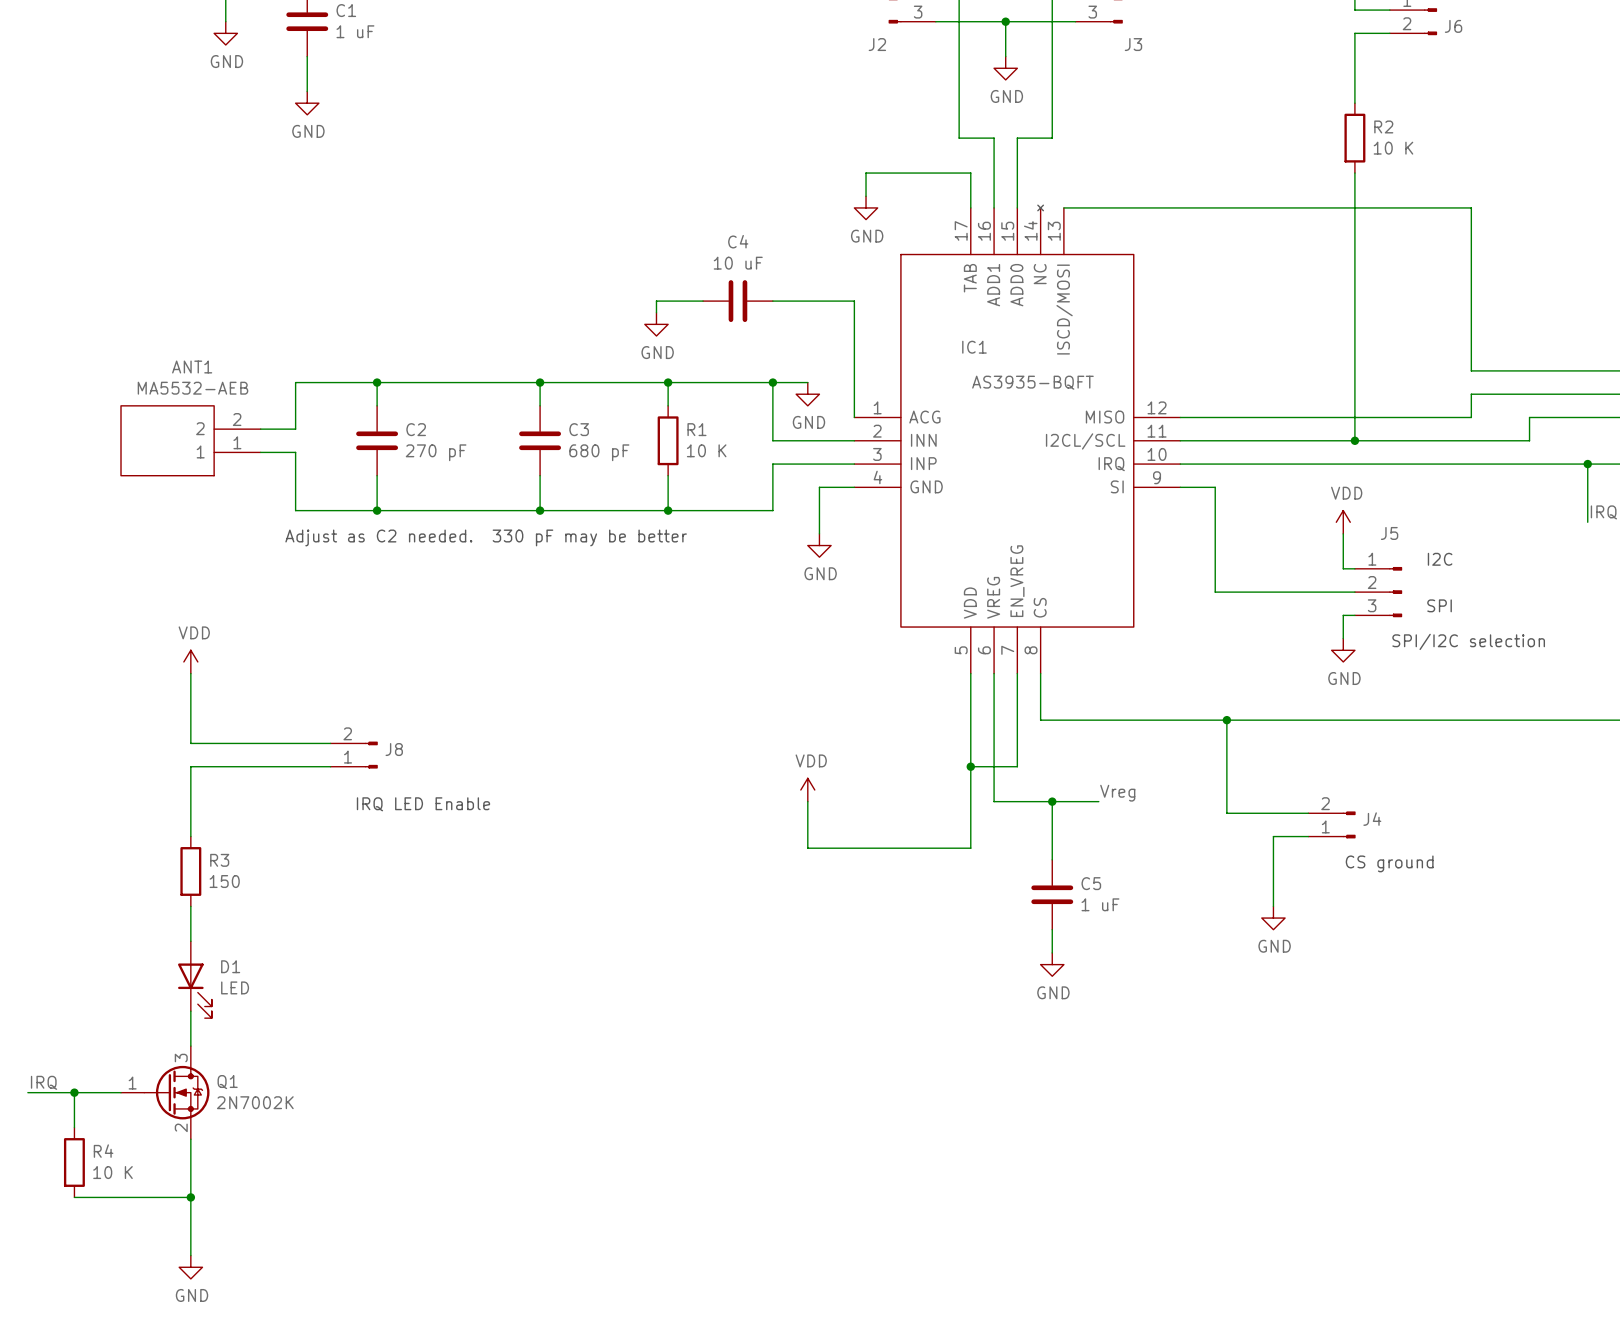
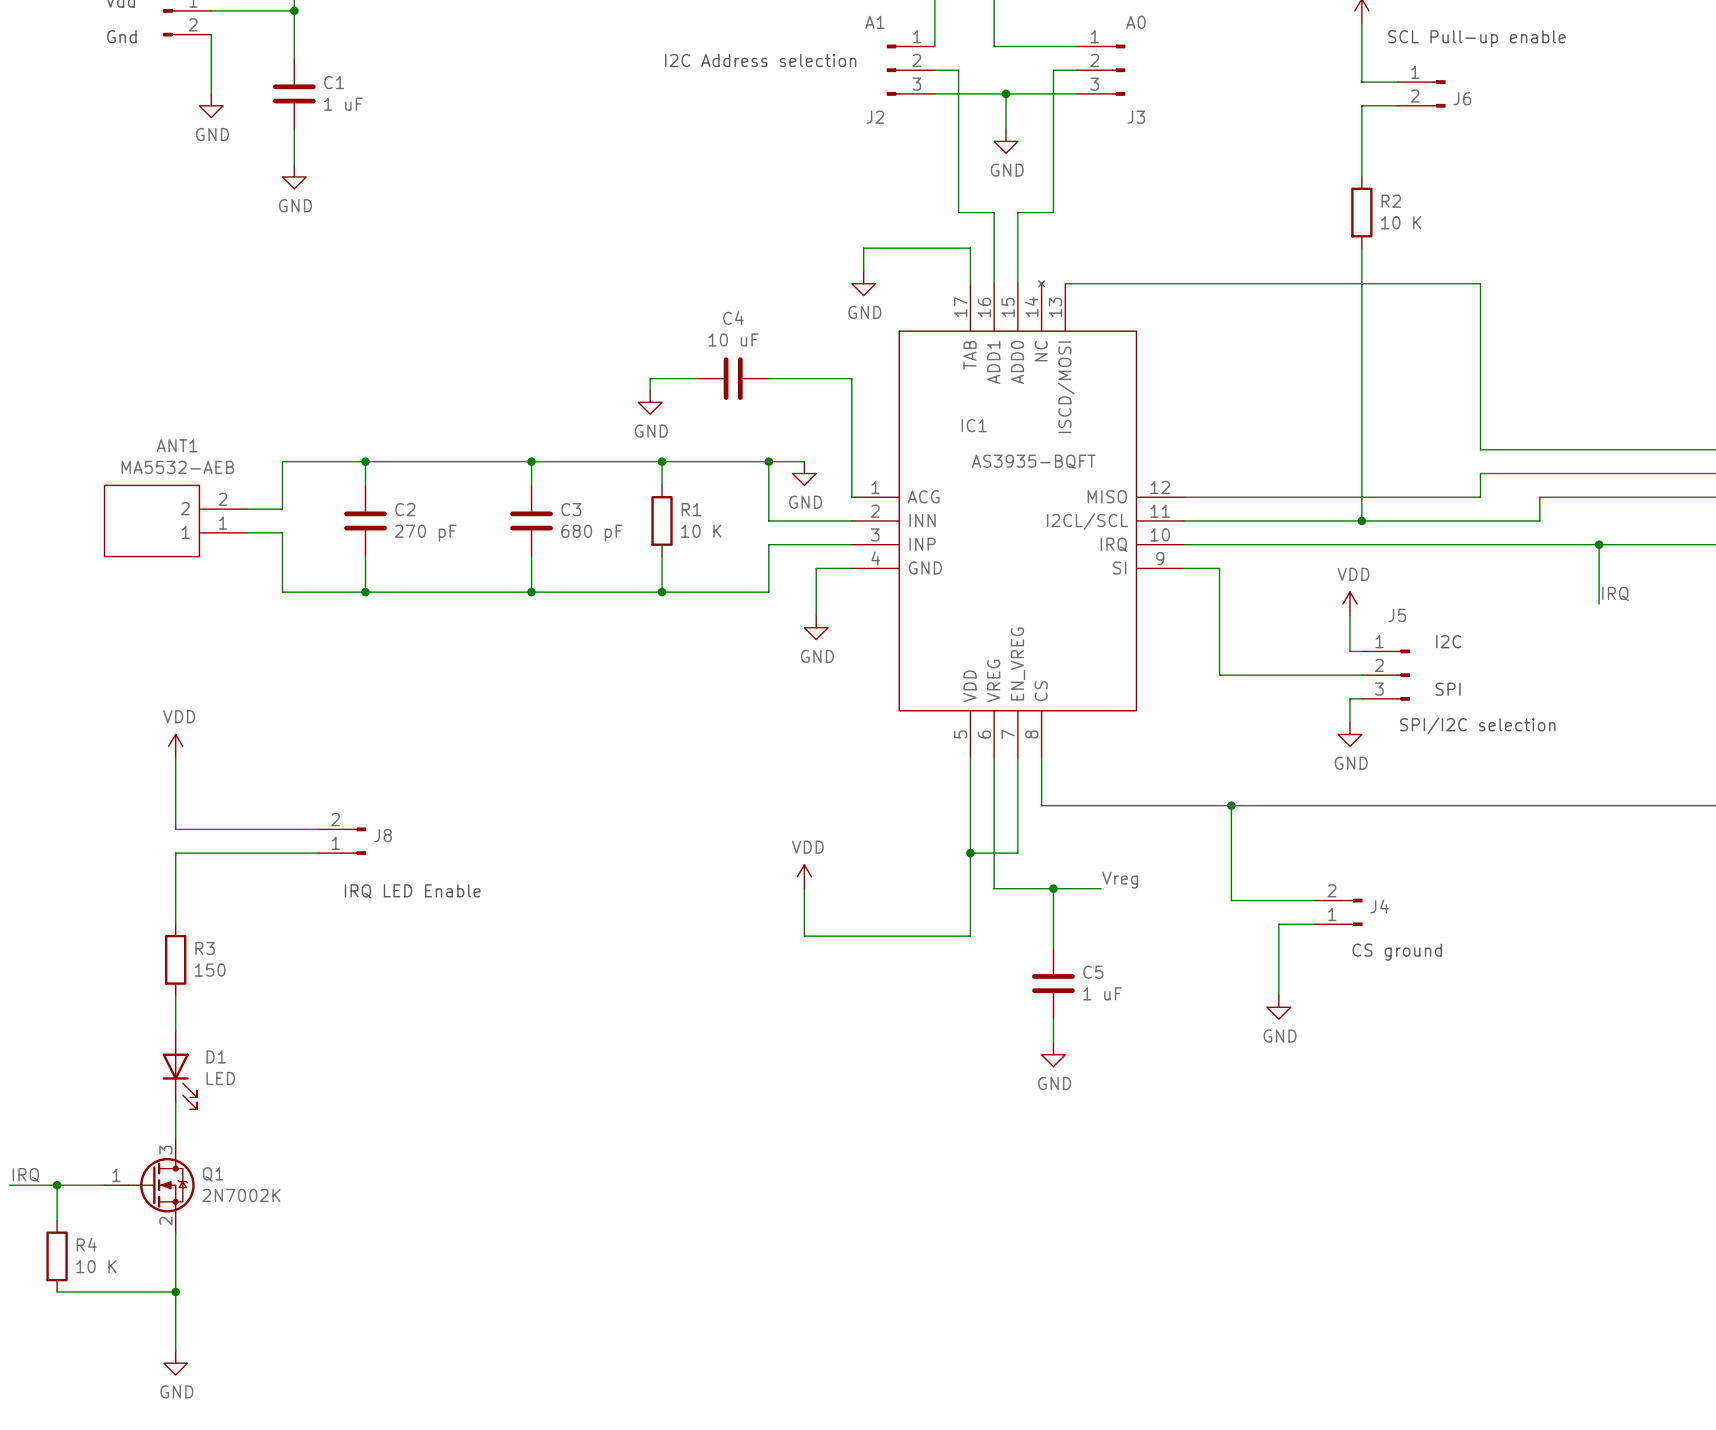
text: Adjust as C2 needed. 330 pF may be better (486, 537) -> none

